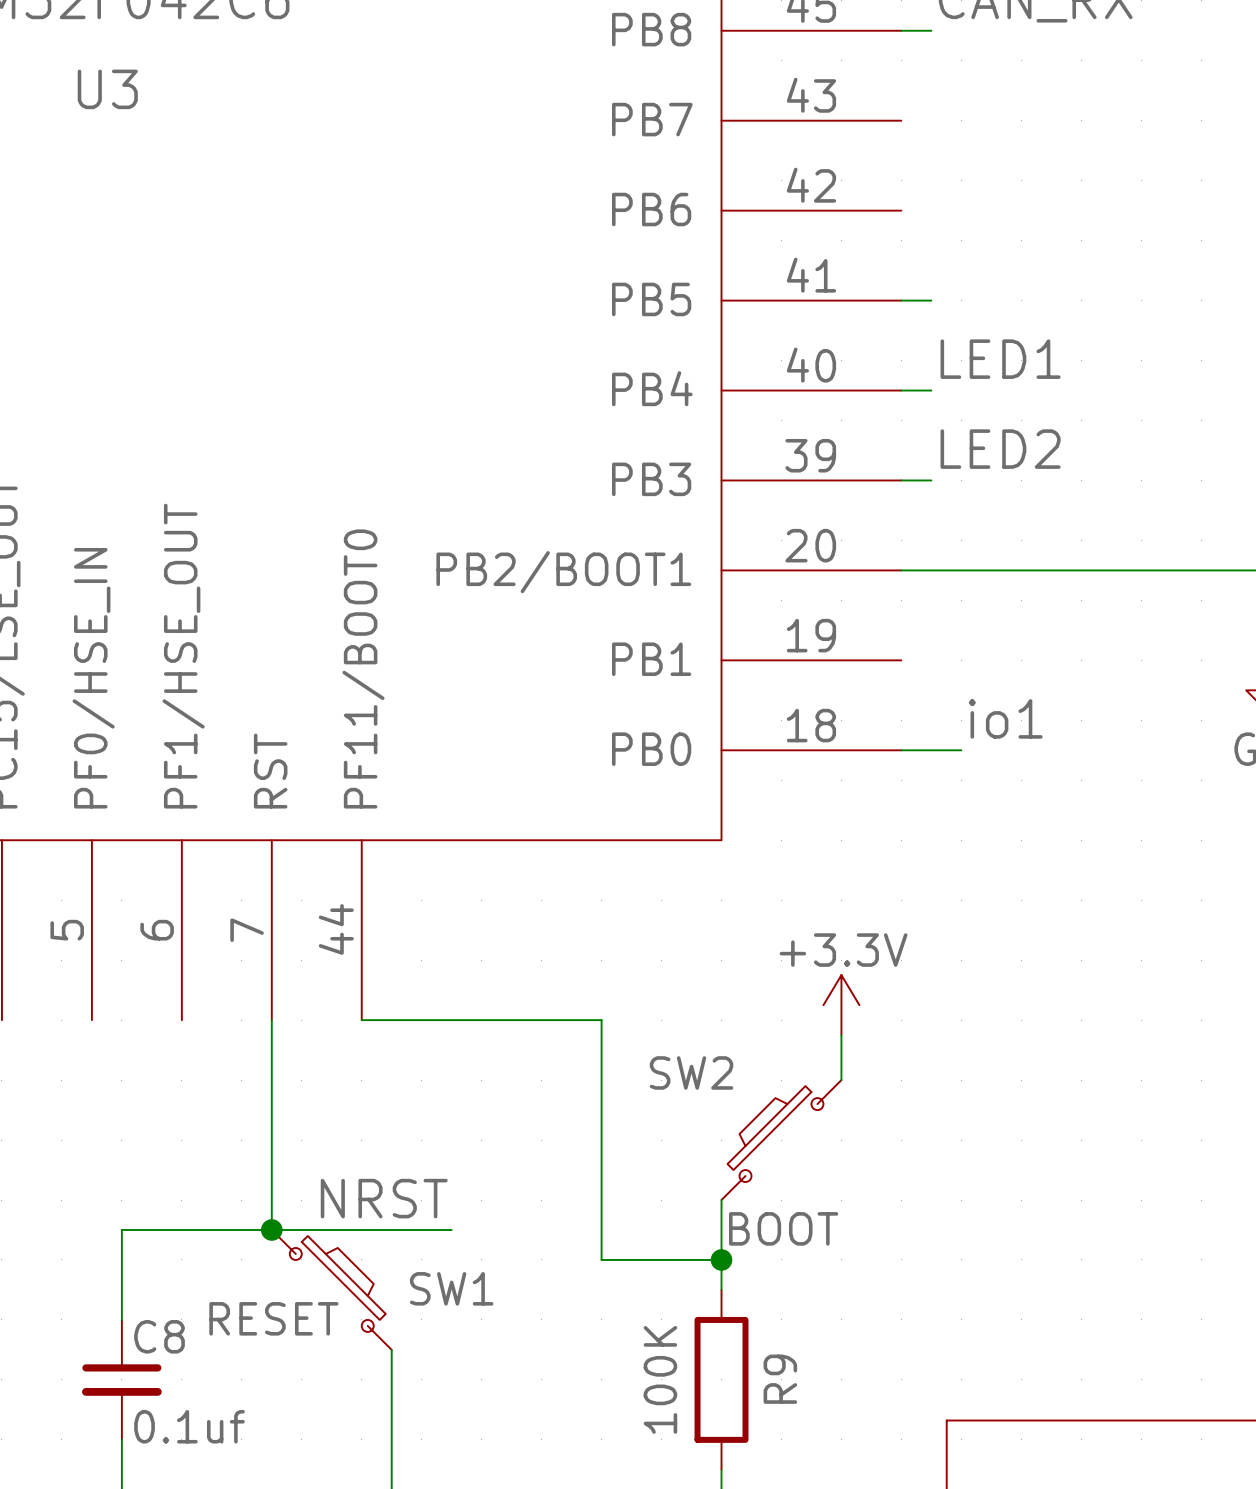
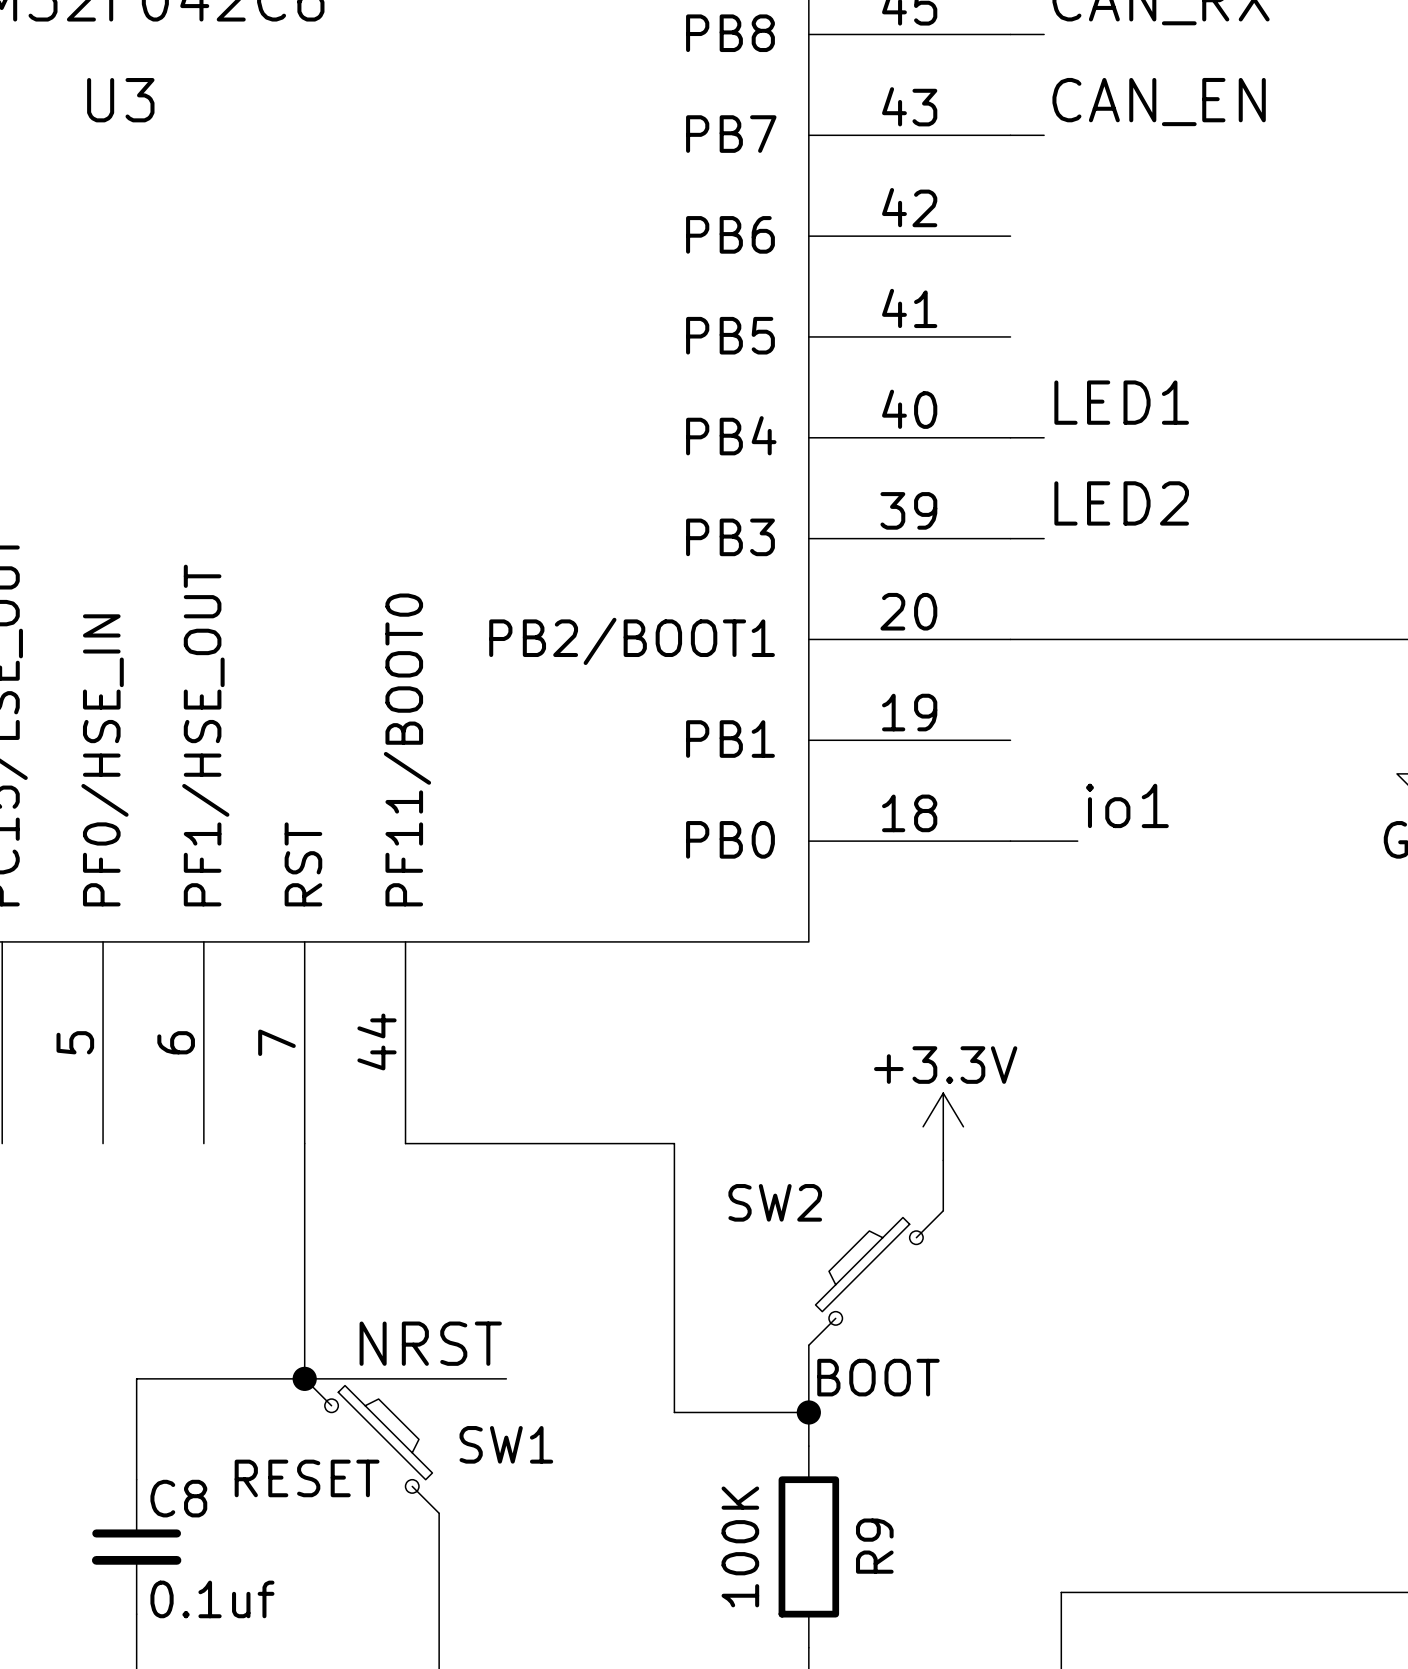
label: none -> CAN_EN (1159, 102)
wire: (901, 300) (931, 300) -> (1010, 135) (1044, 135)

